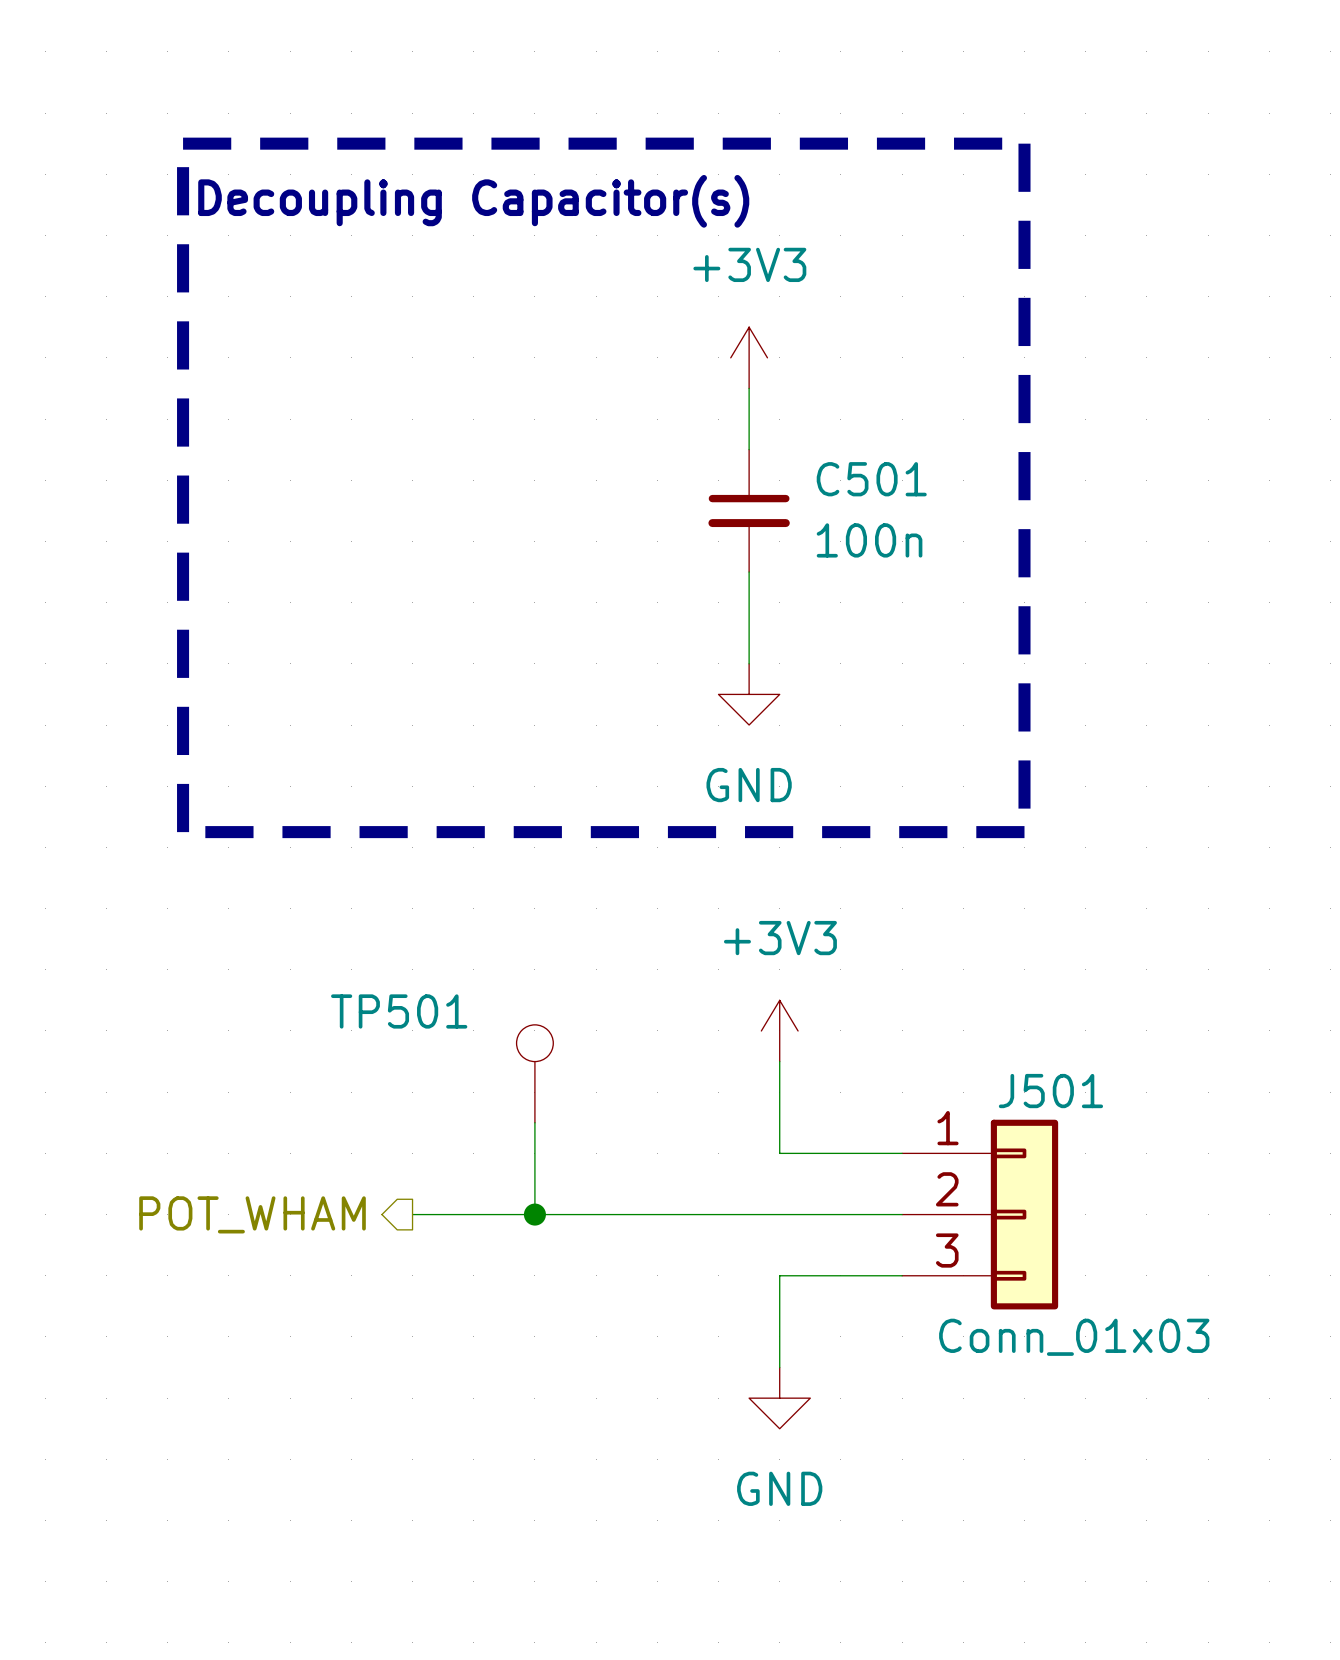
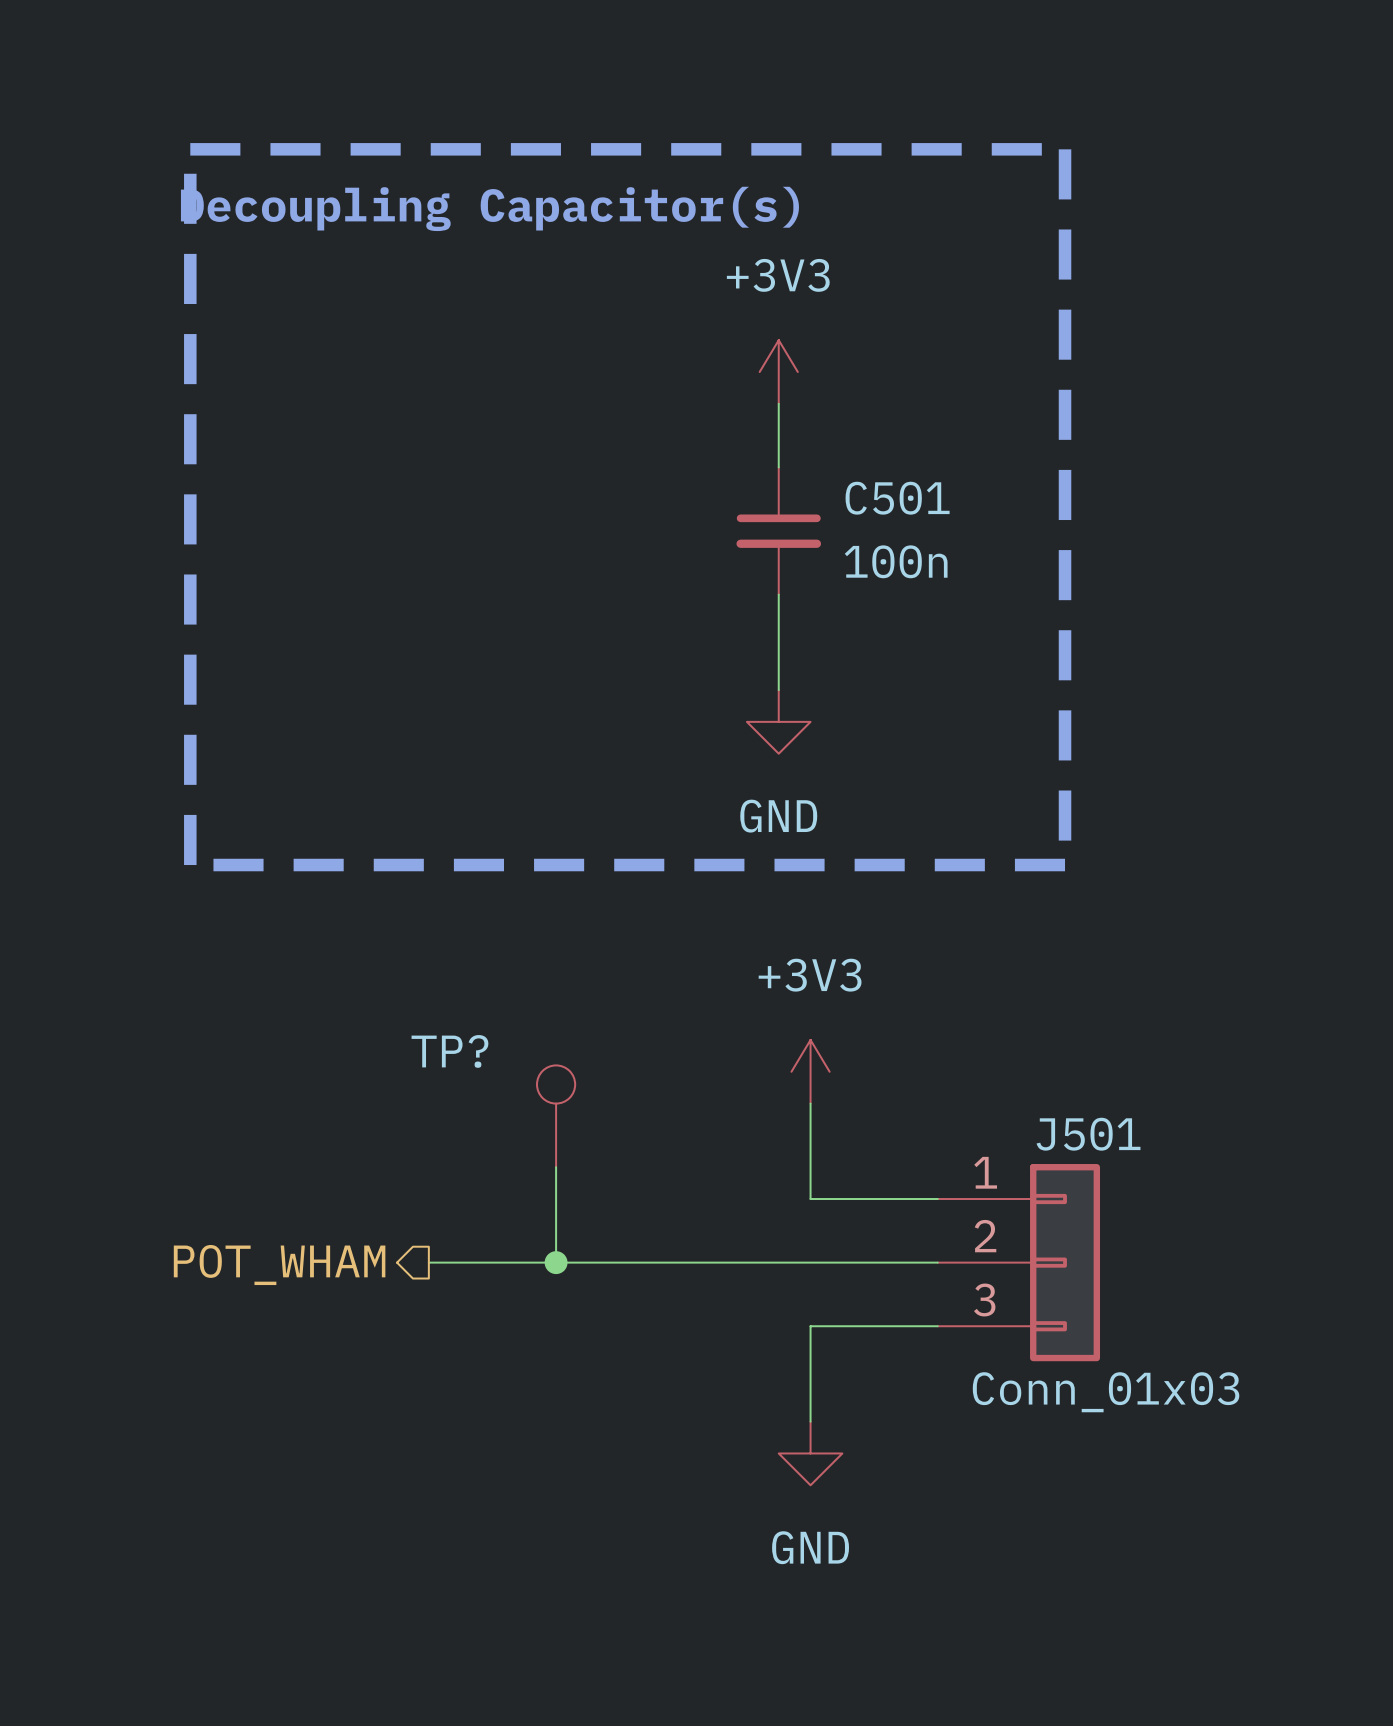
TP501 name: TP501 (399, 1011) -> TP? (449, 1051)

